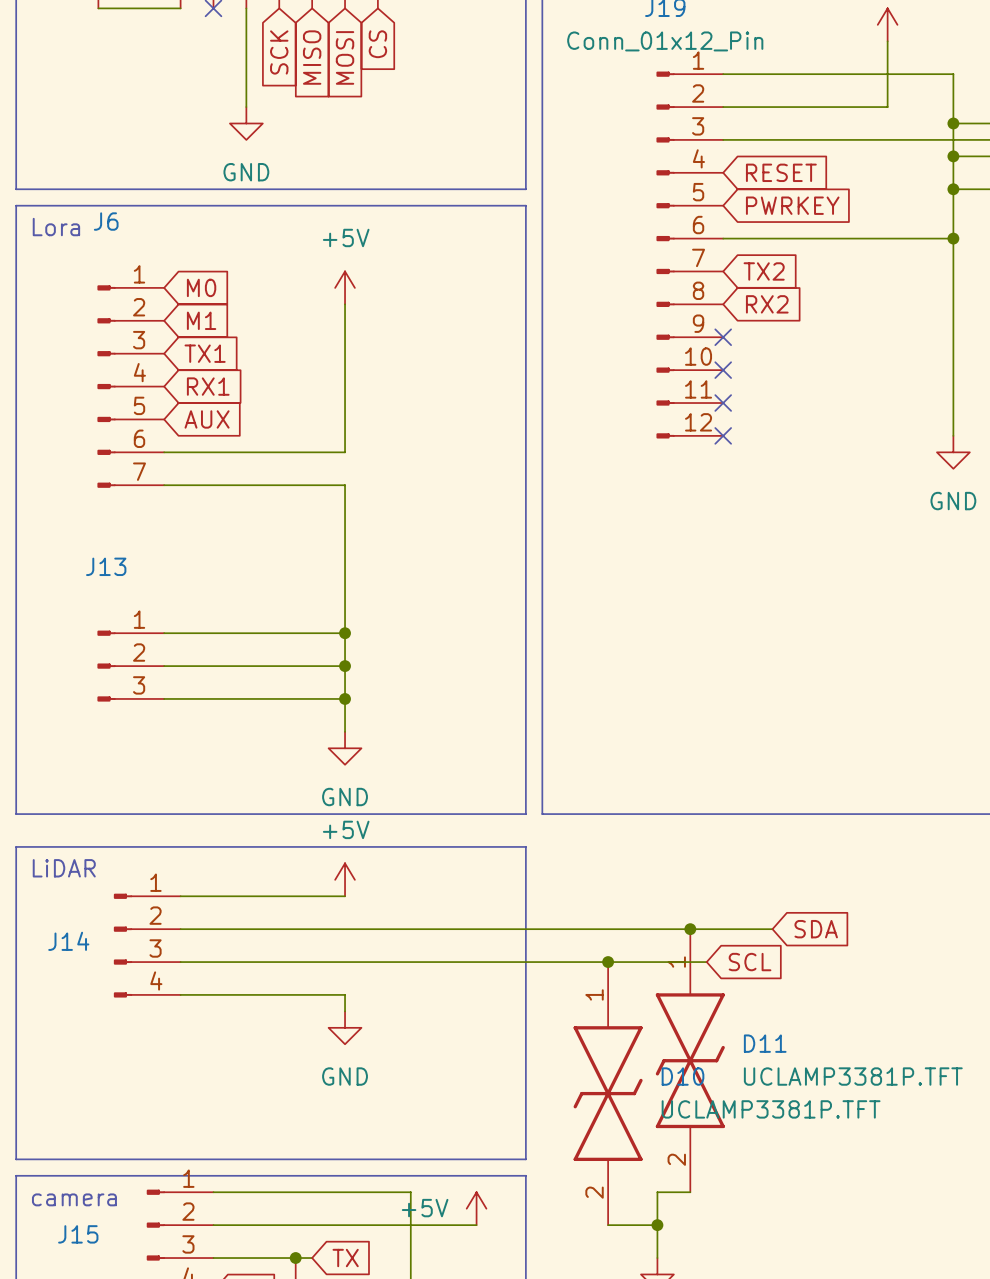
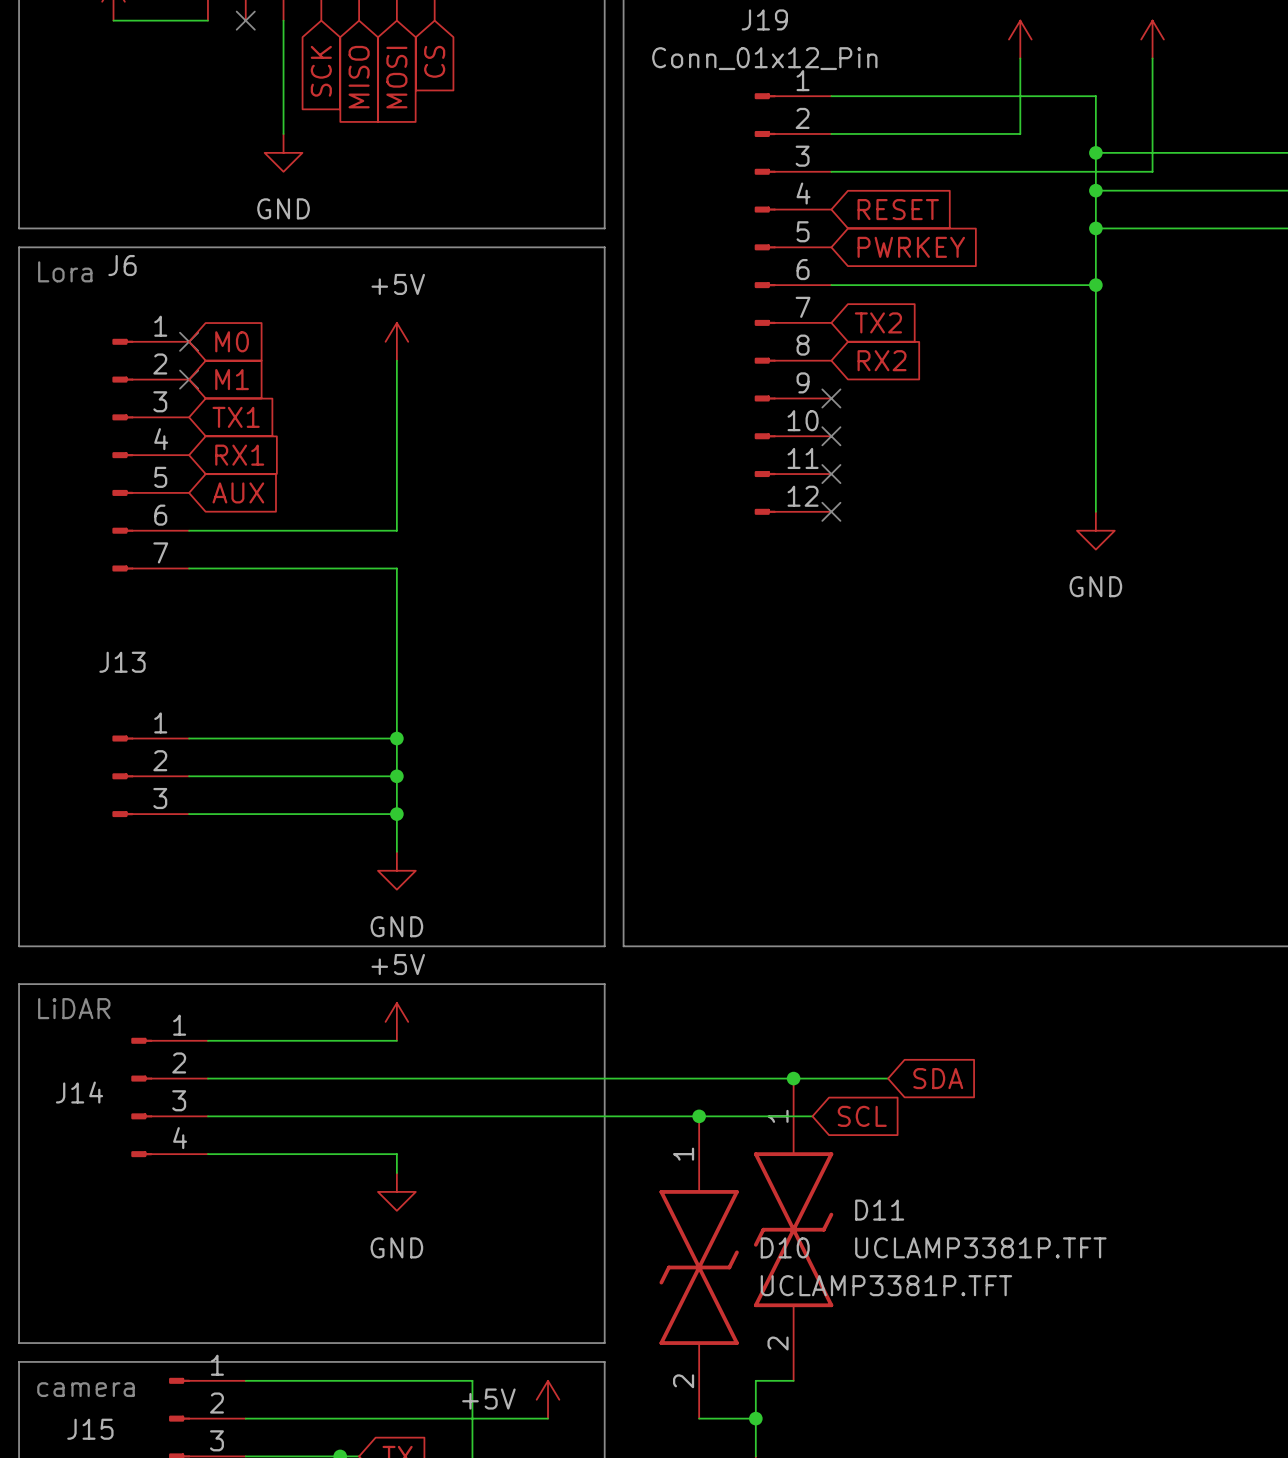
no-connect mark: none -> (189, 341)
no-connect mark: none -> (189, 379)

